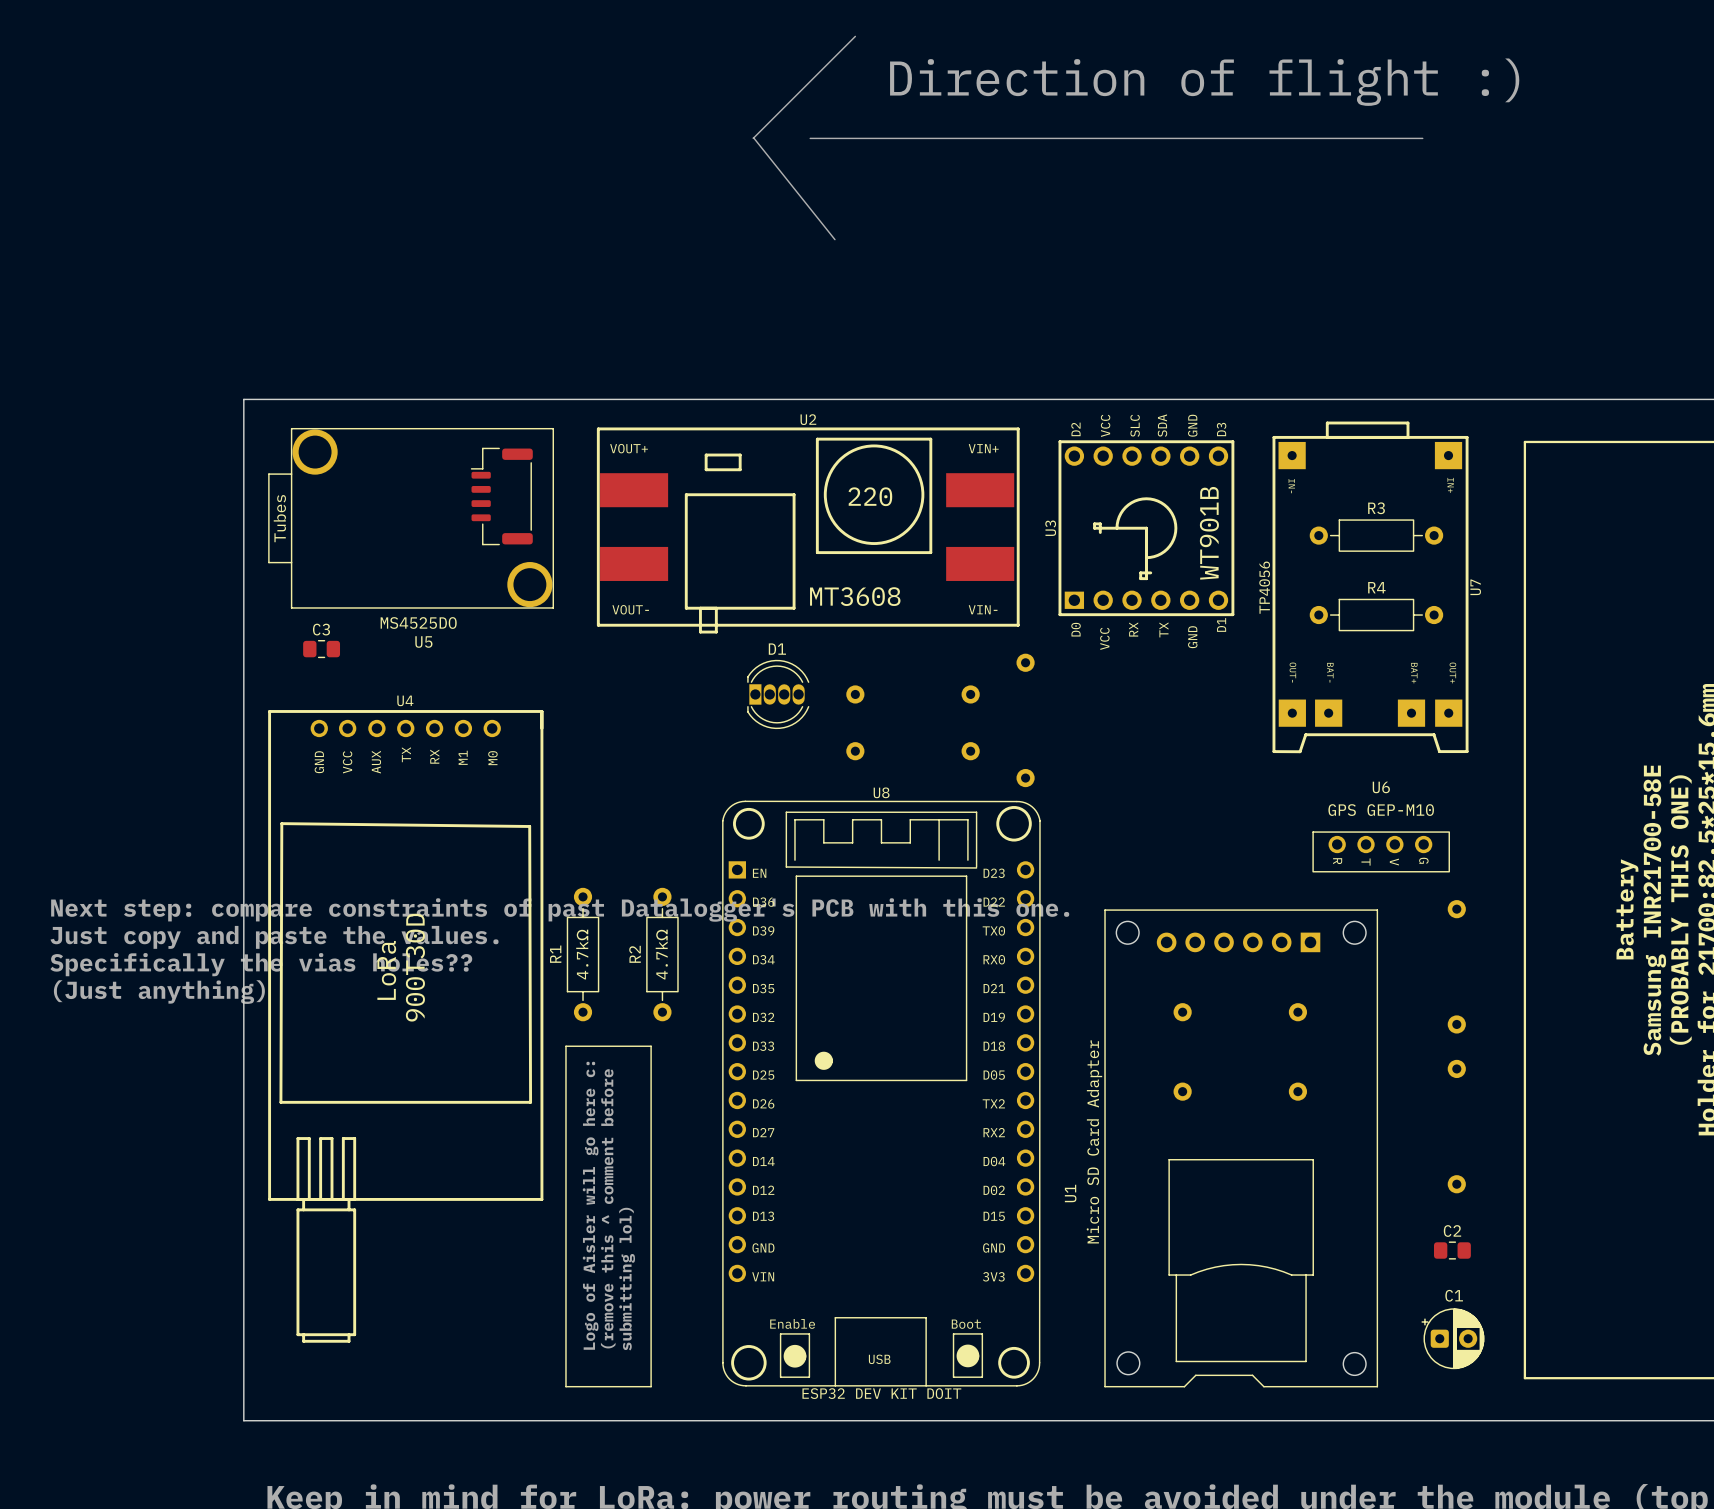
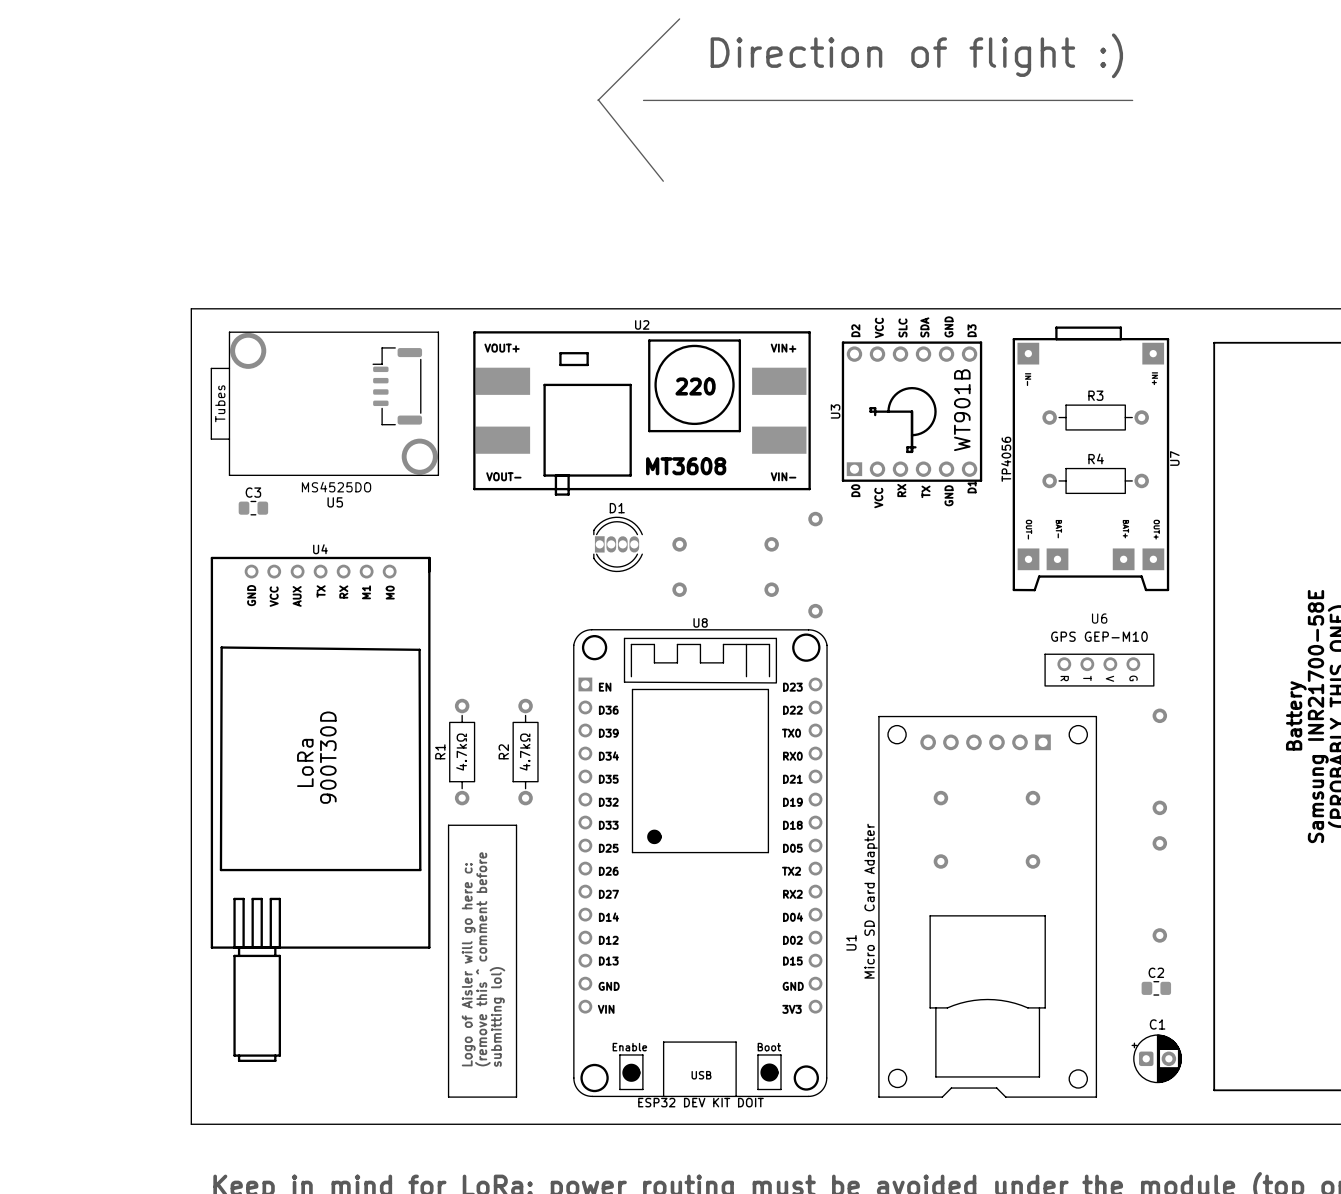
text: Next step: compare constraints of past Datalogger's PCB with this one. (560, 909) -> none
text: Just copy and paste the values. (274, 937) -> none
text: Specifically the vias holes?? (261, 964) -> none
text: (Just anything) (159, 992) -> none

